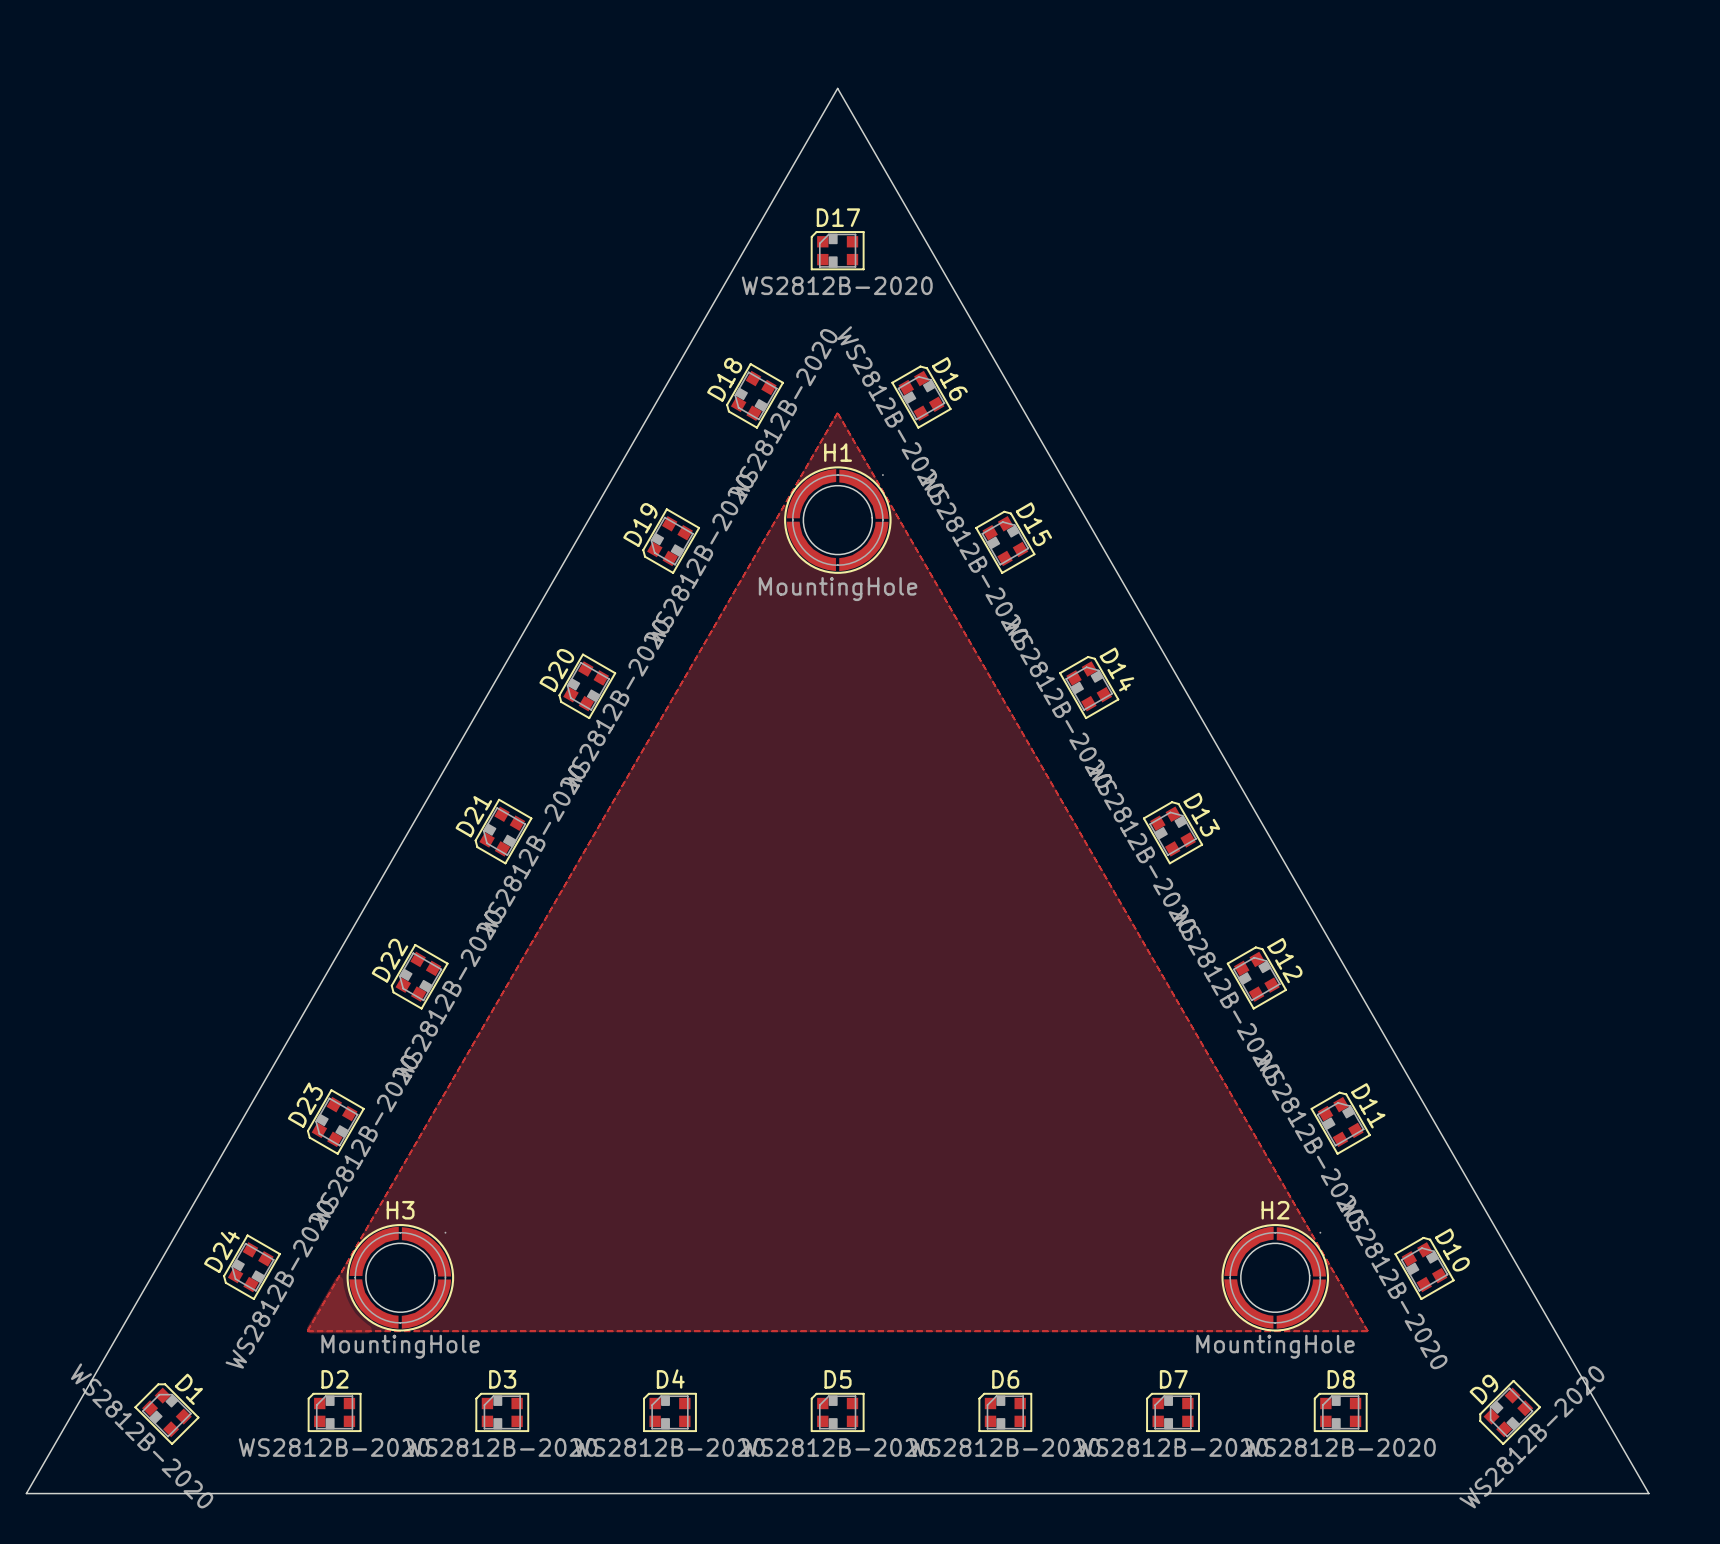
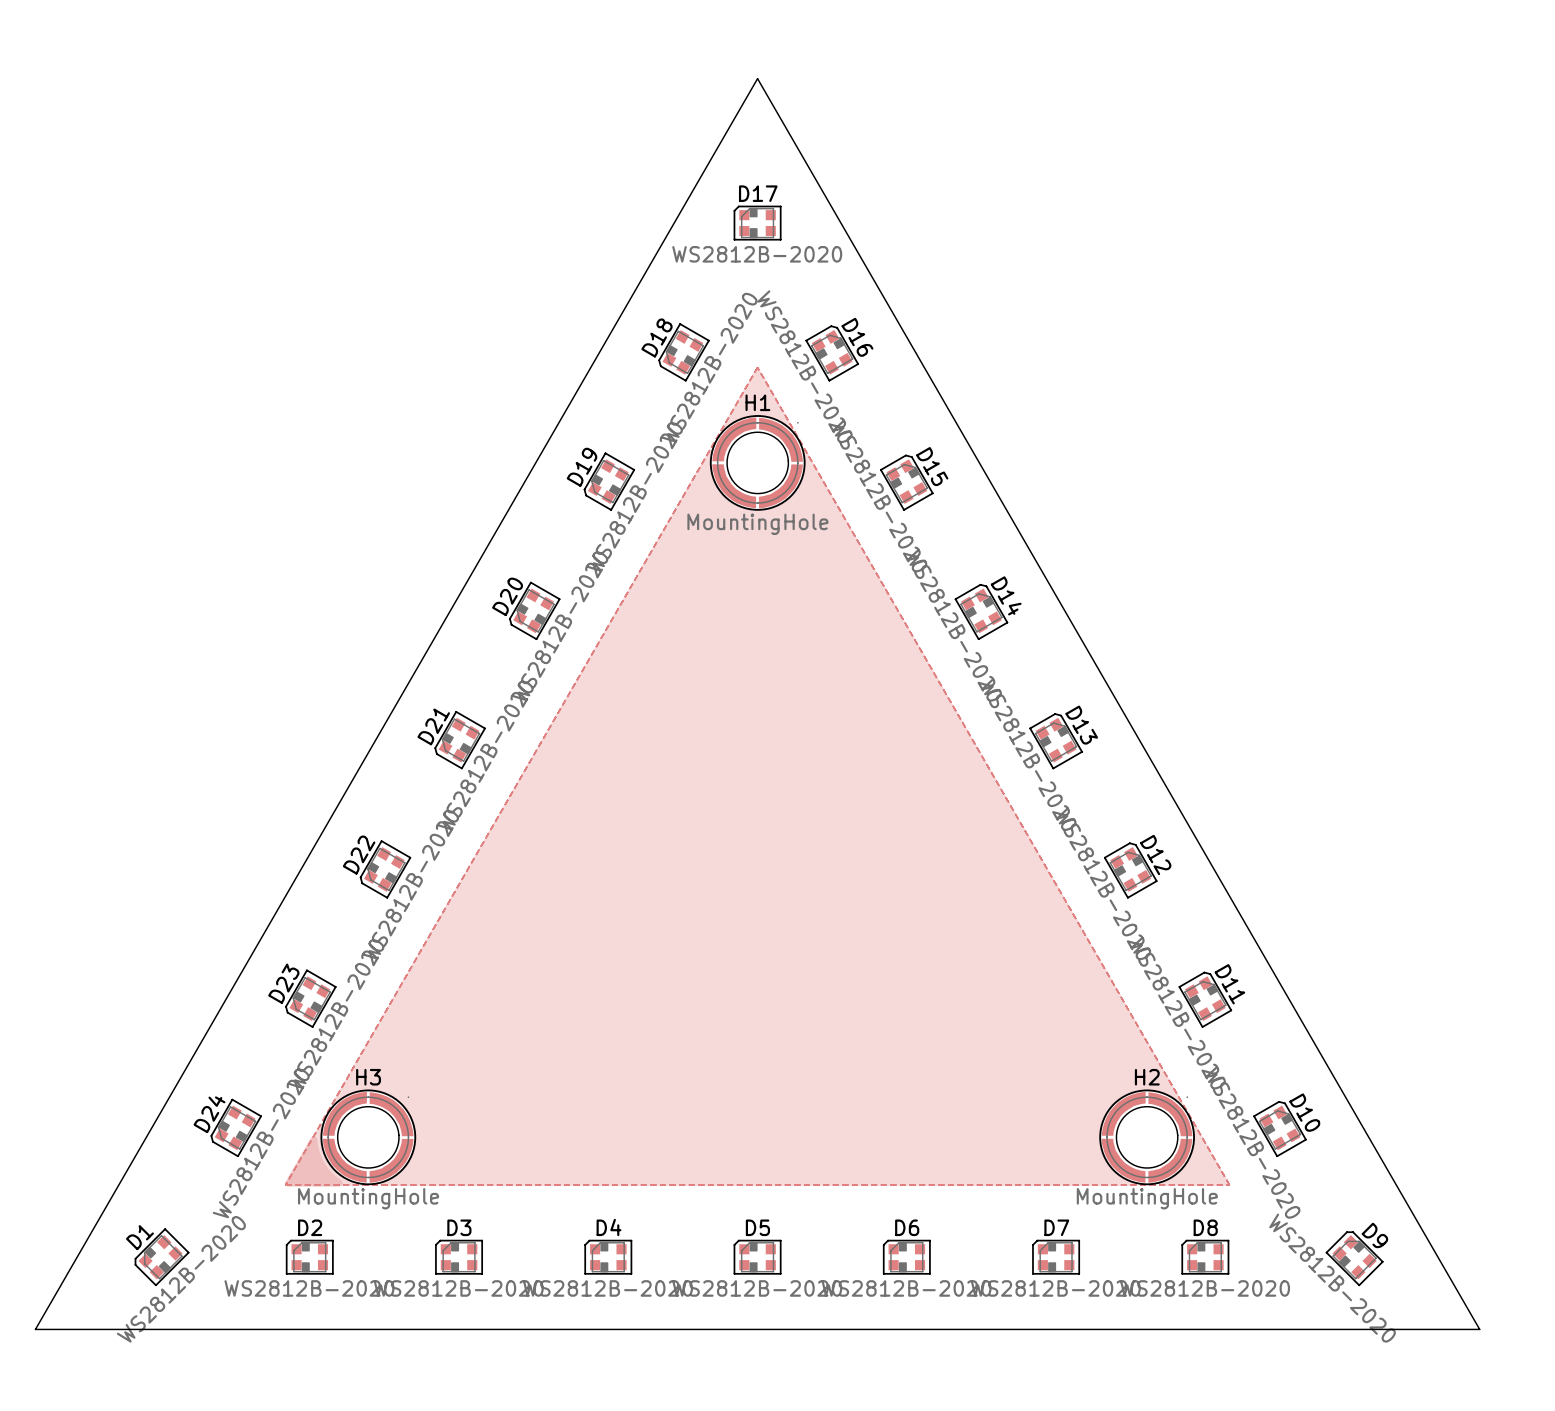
D9 rotation: 0° (1510, 1412) -> 90° clockwise (1354, 1258)
D1 rotation: 0° (166, 1414) -> 90° counterclockwise (162, 1257)

